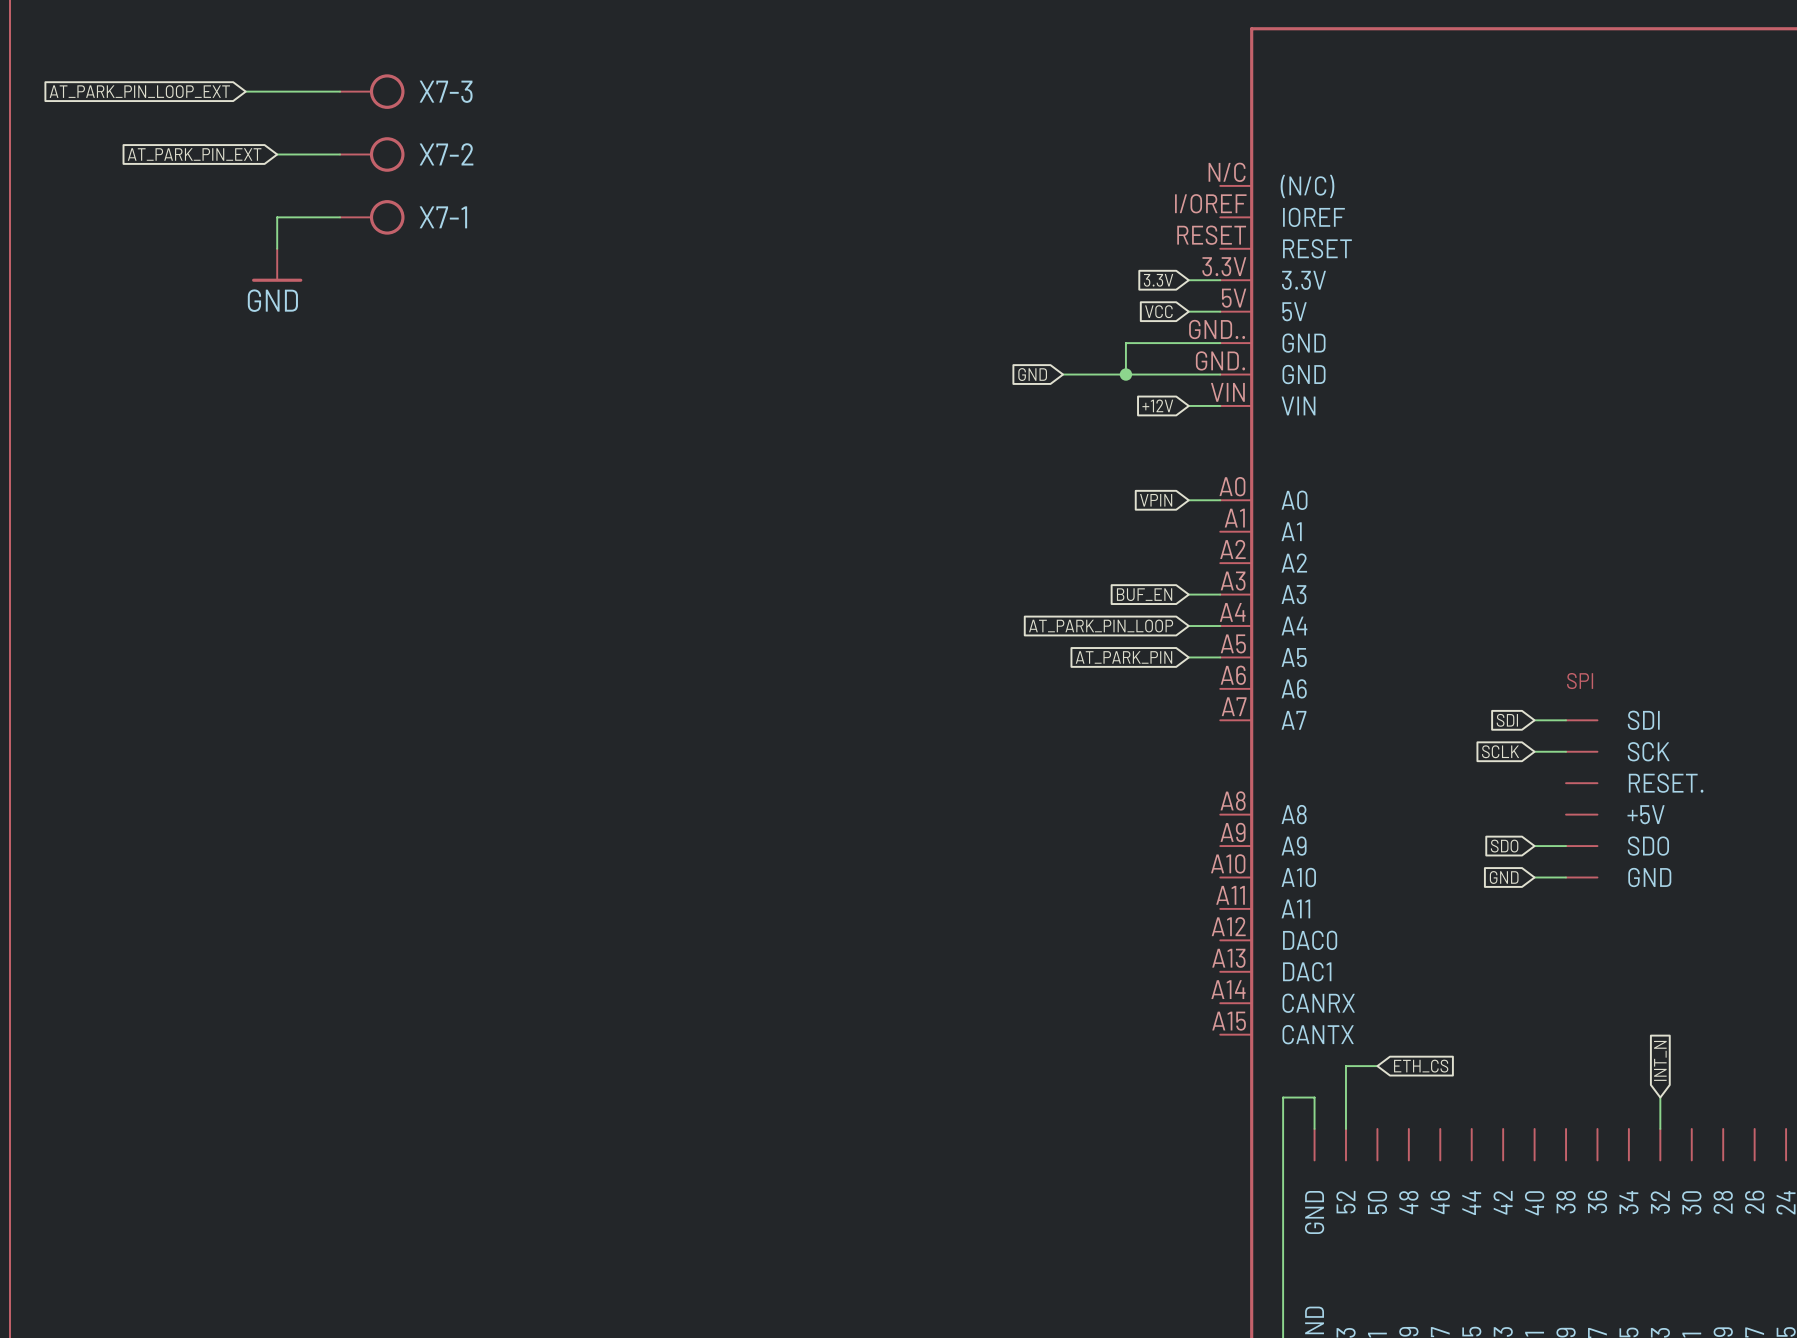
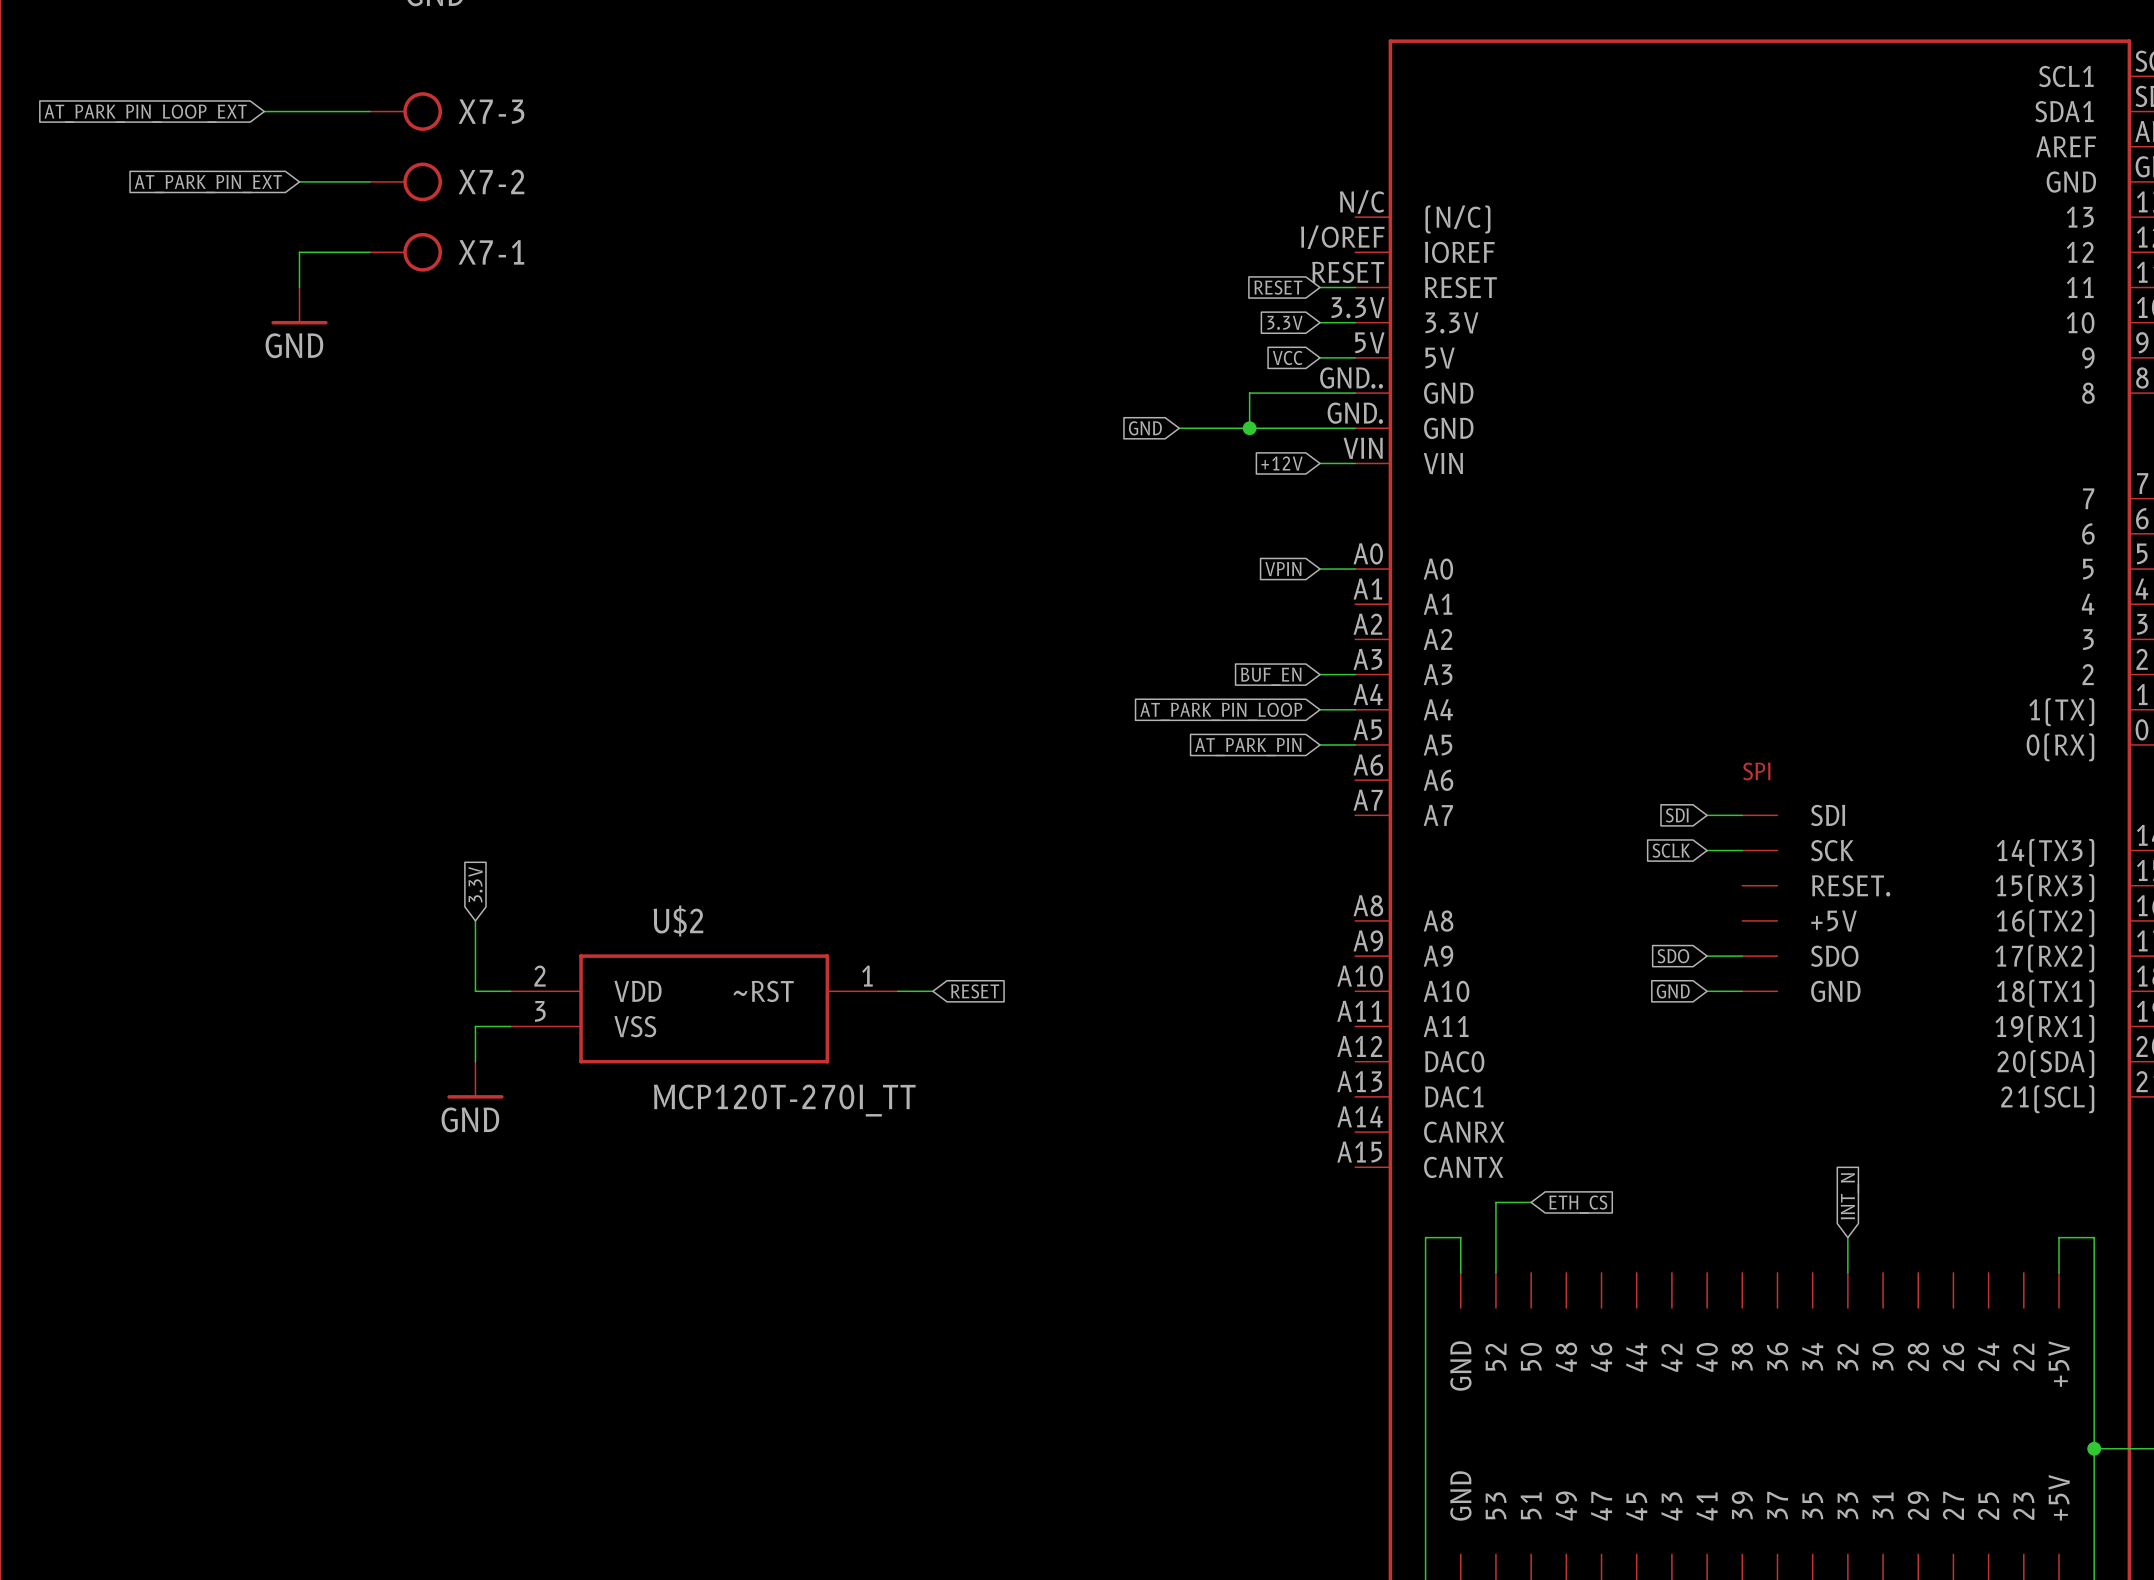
global label: none -> RESET (1278, 287)
wire: none -> (1320, 287) (1355, 287)
global label: none -> 3.3V (475, 884)
wire: none -> (475, 920) (475, 991) (510, 991)
wire: none -> (897, 991) (932, 991)
global label: none -> RESET (975, 991)
U$2: none -> MCP120T-270I_TT (704, 1008)
wire: none -> (510, 1026) (475, 1026) (475, 1061)
power symbol: none -> GND (475, 1080)

